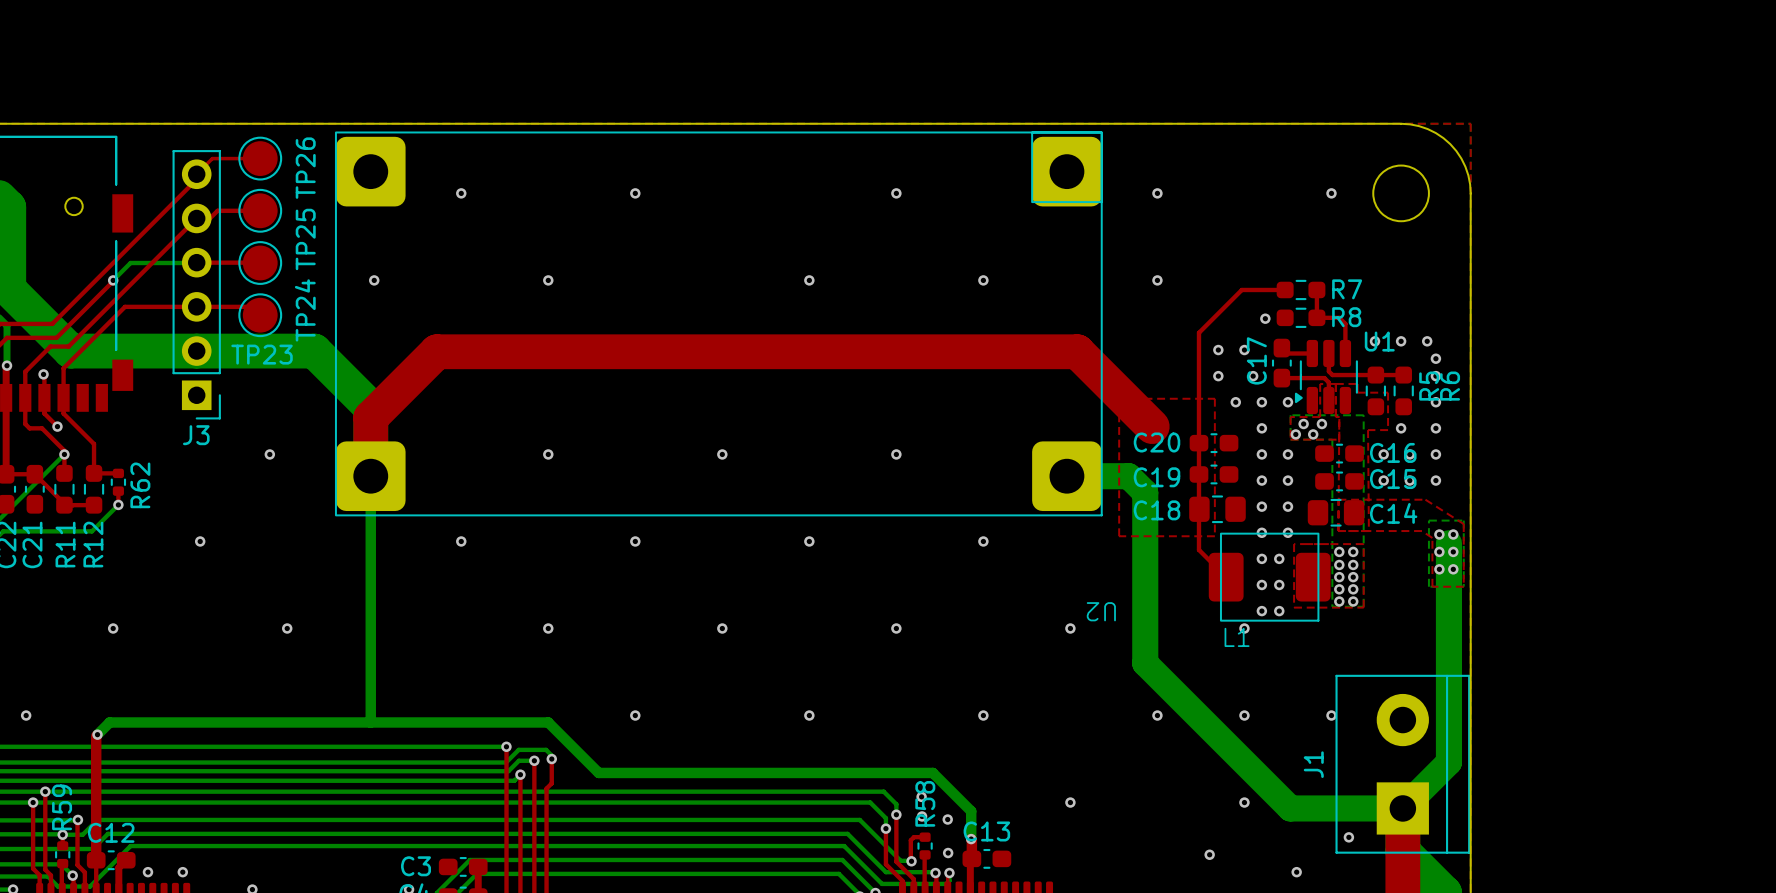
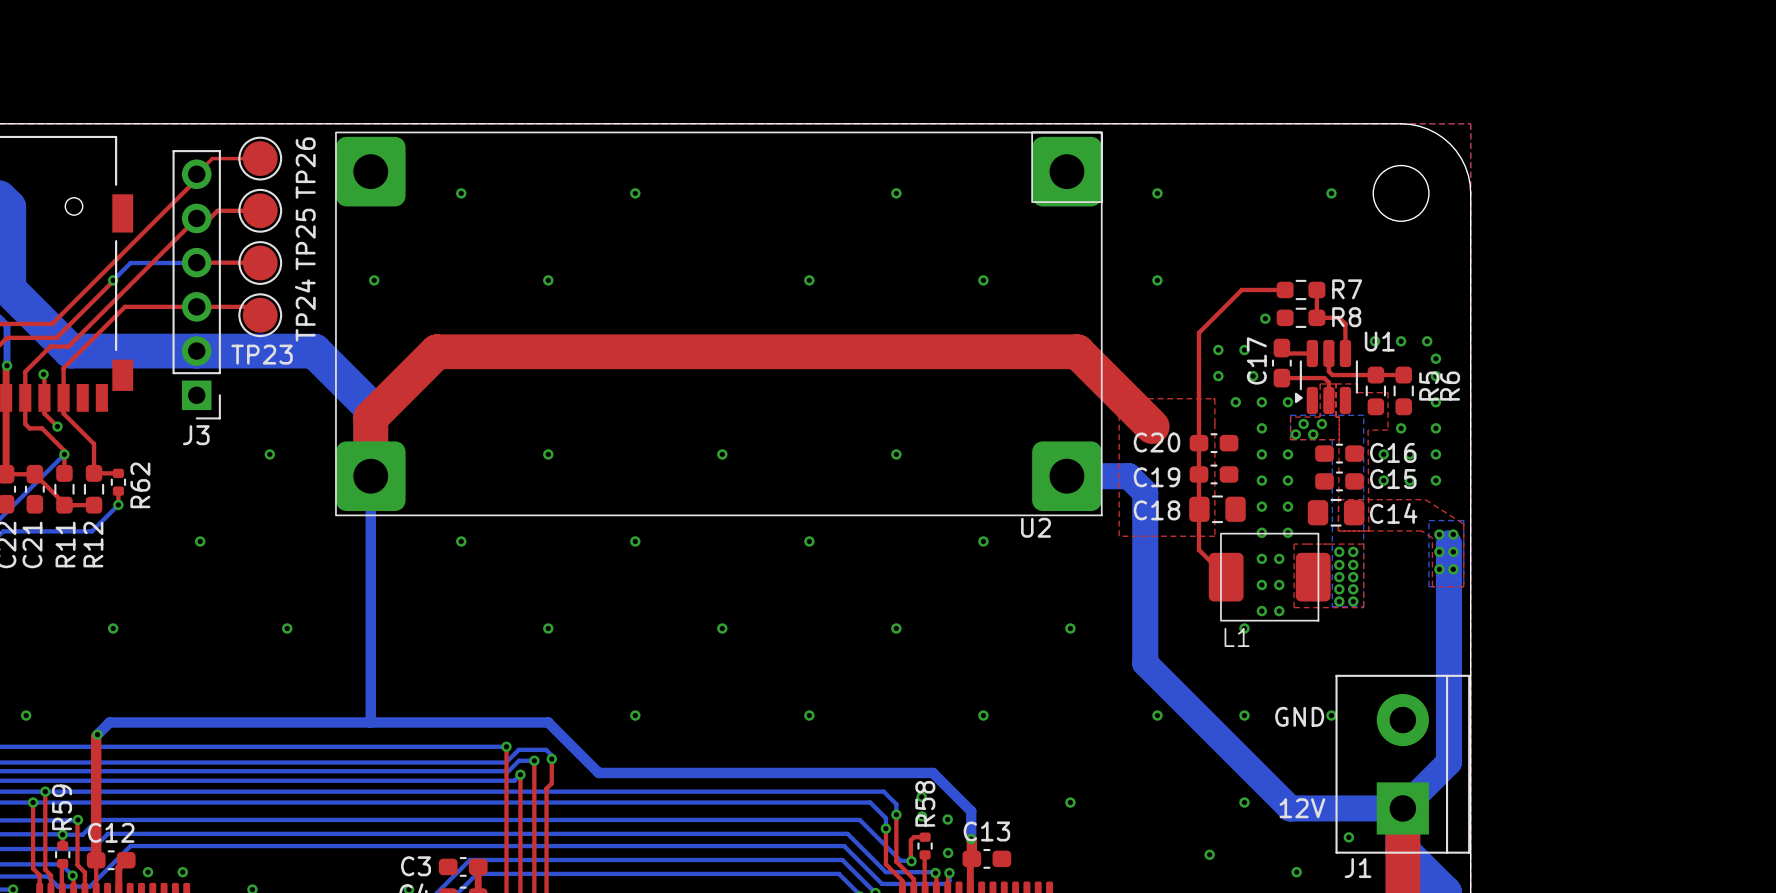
U2 name rotation: 0° (1101, 611) -> 180° (1036, 527)
U2 name position: U2 (1101, 611) -> U2 (1036, 527)
text: none -> GND (1299, 716)
J1 name rotation: 0° (1313, 764) -> 90° clockwise (1358, 868)
J1 name position: J1 (1313, 764) -> J1 (1358, 868)
text: none -> 12V (1302, 808)

